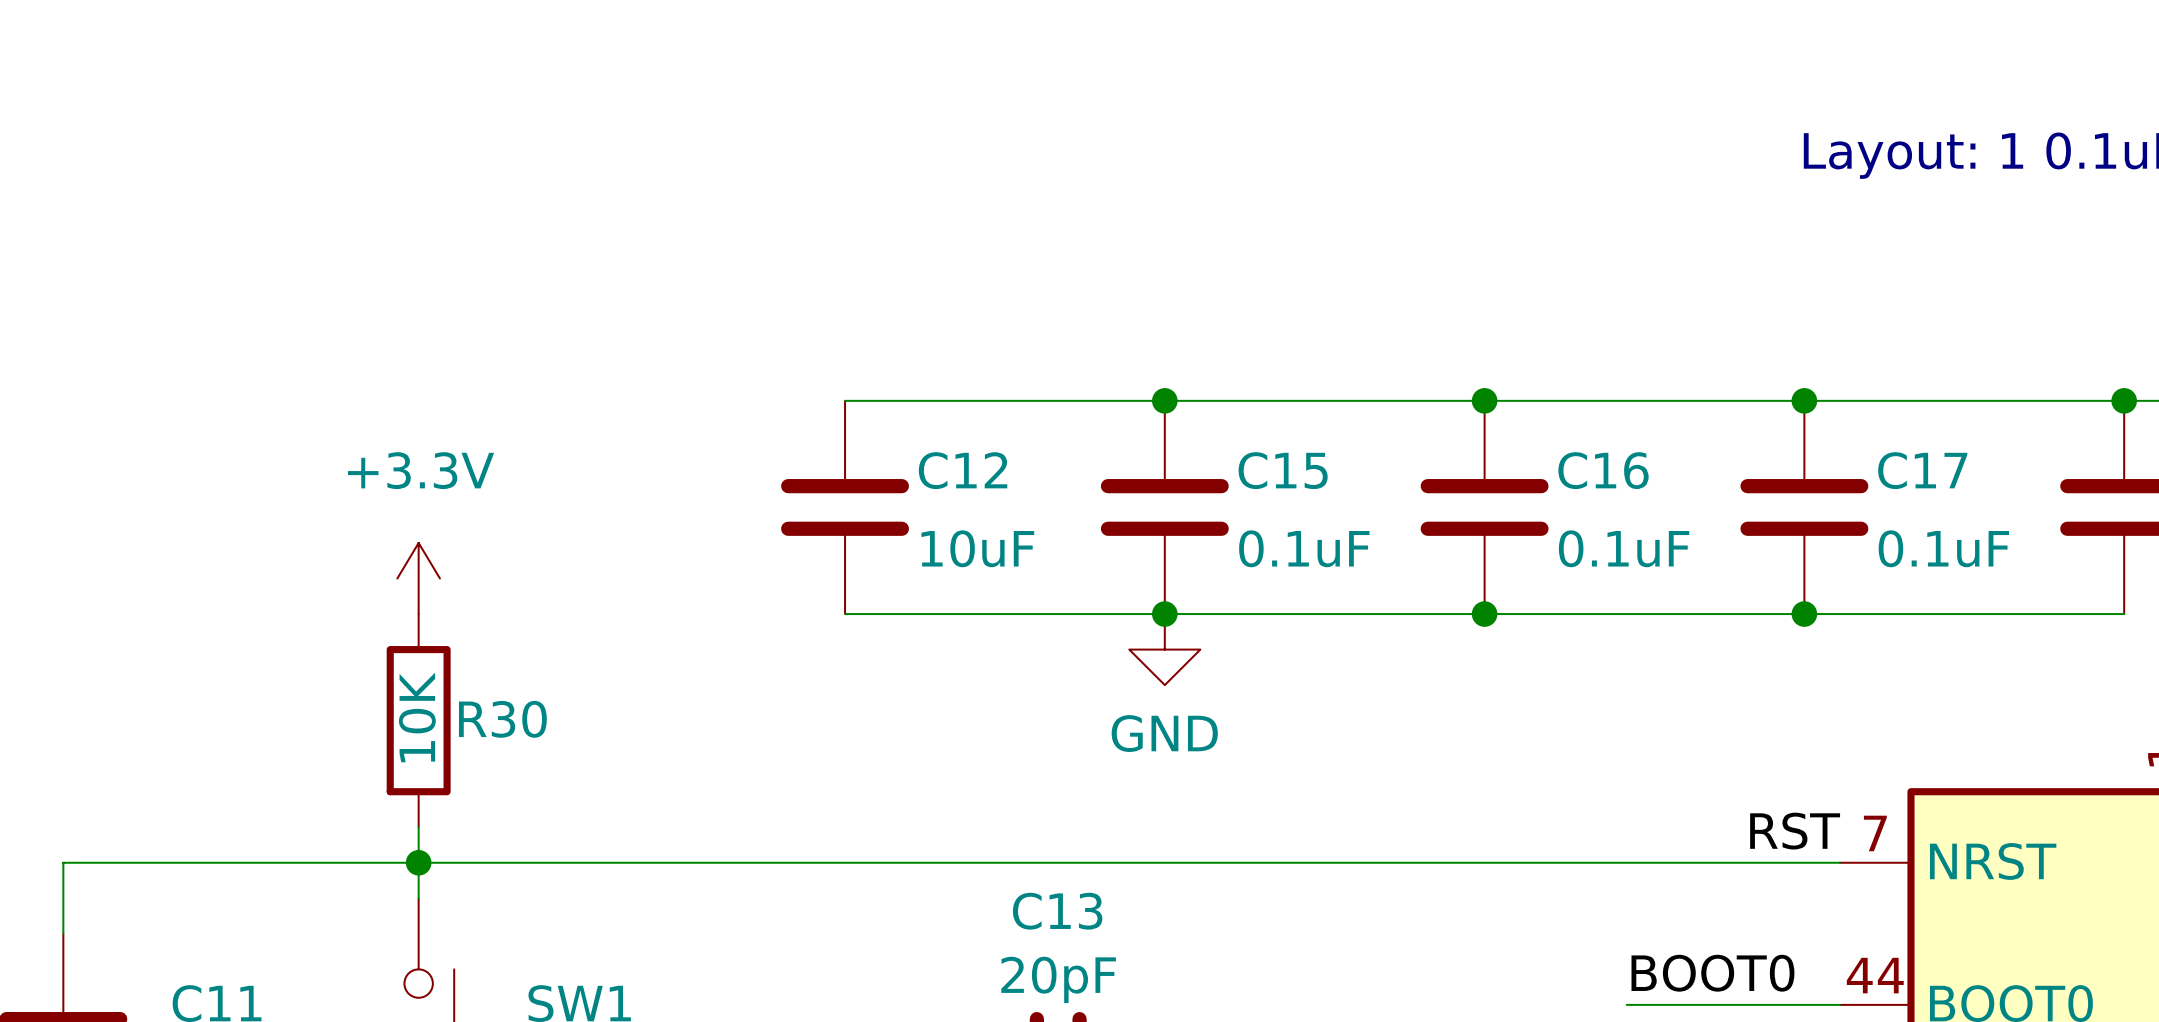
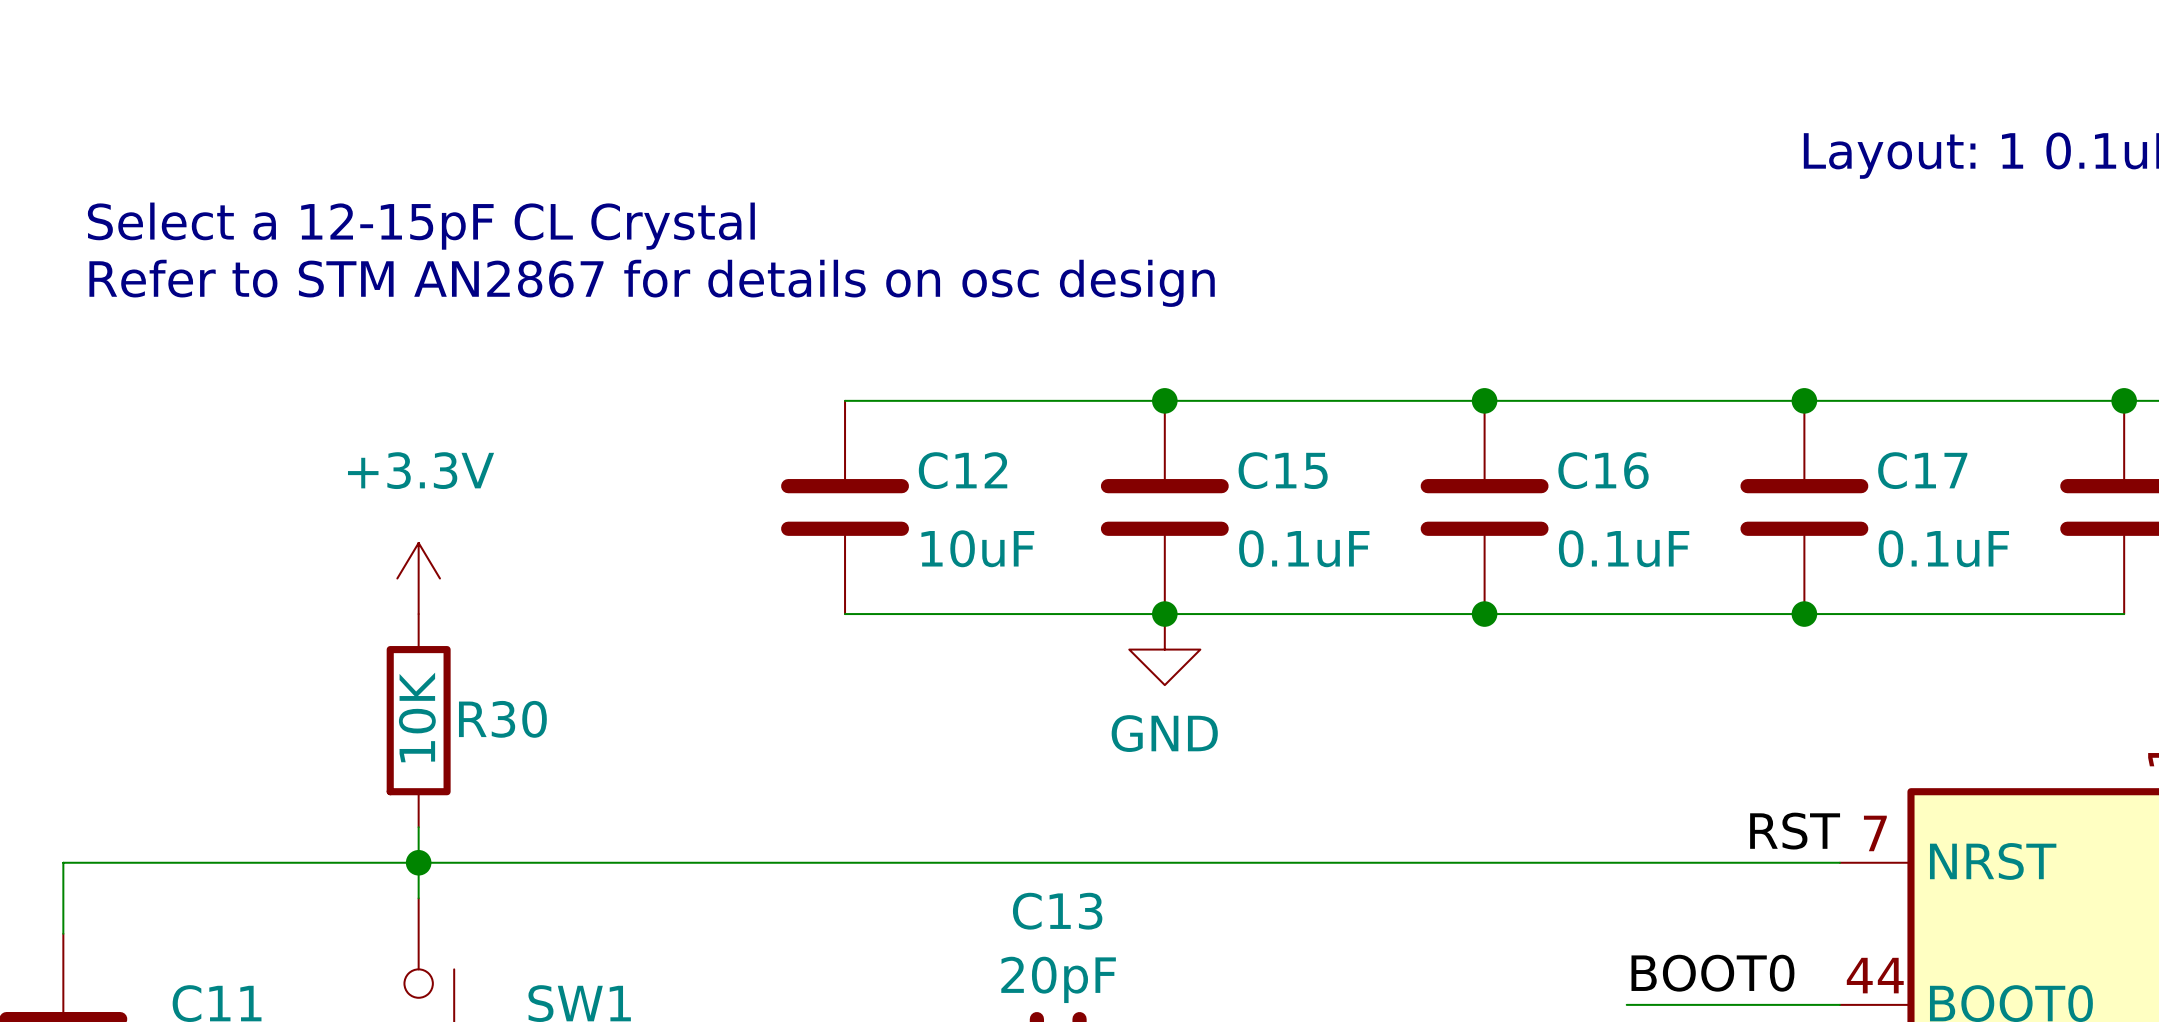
text: none -> Select a 12-15pF CL Crystal (421, 226)
text: none -> Refer to STM AN2867 for details on osc design (652, 283)

